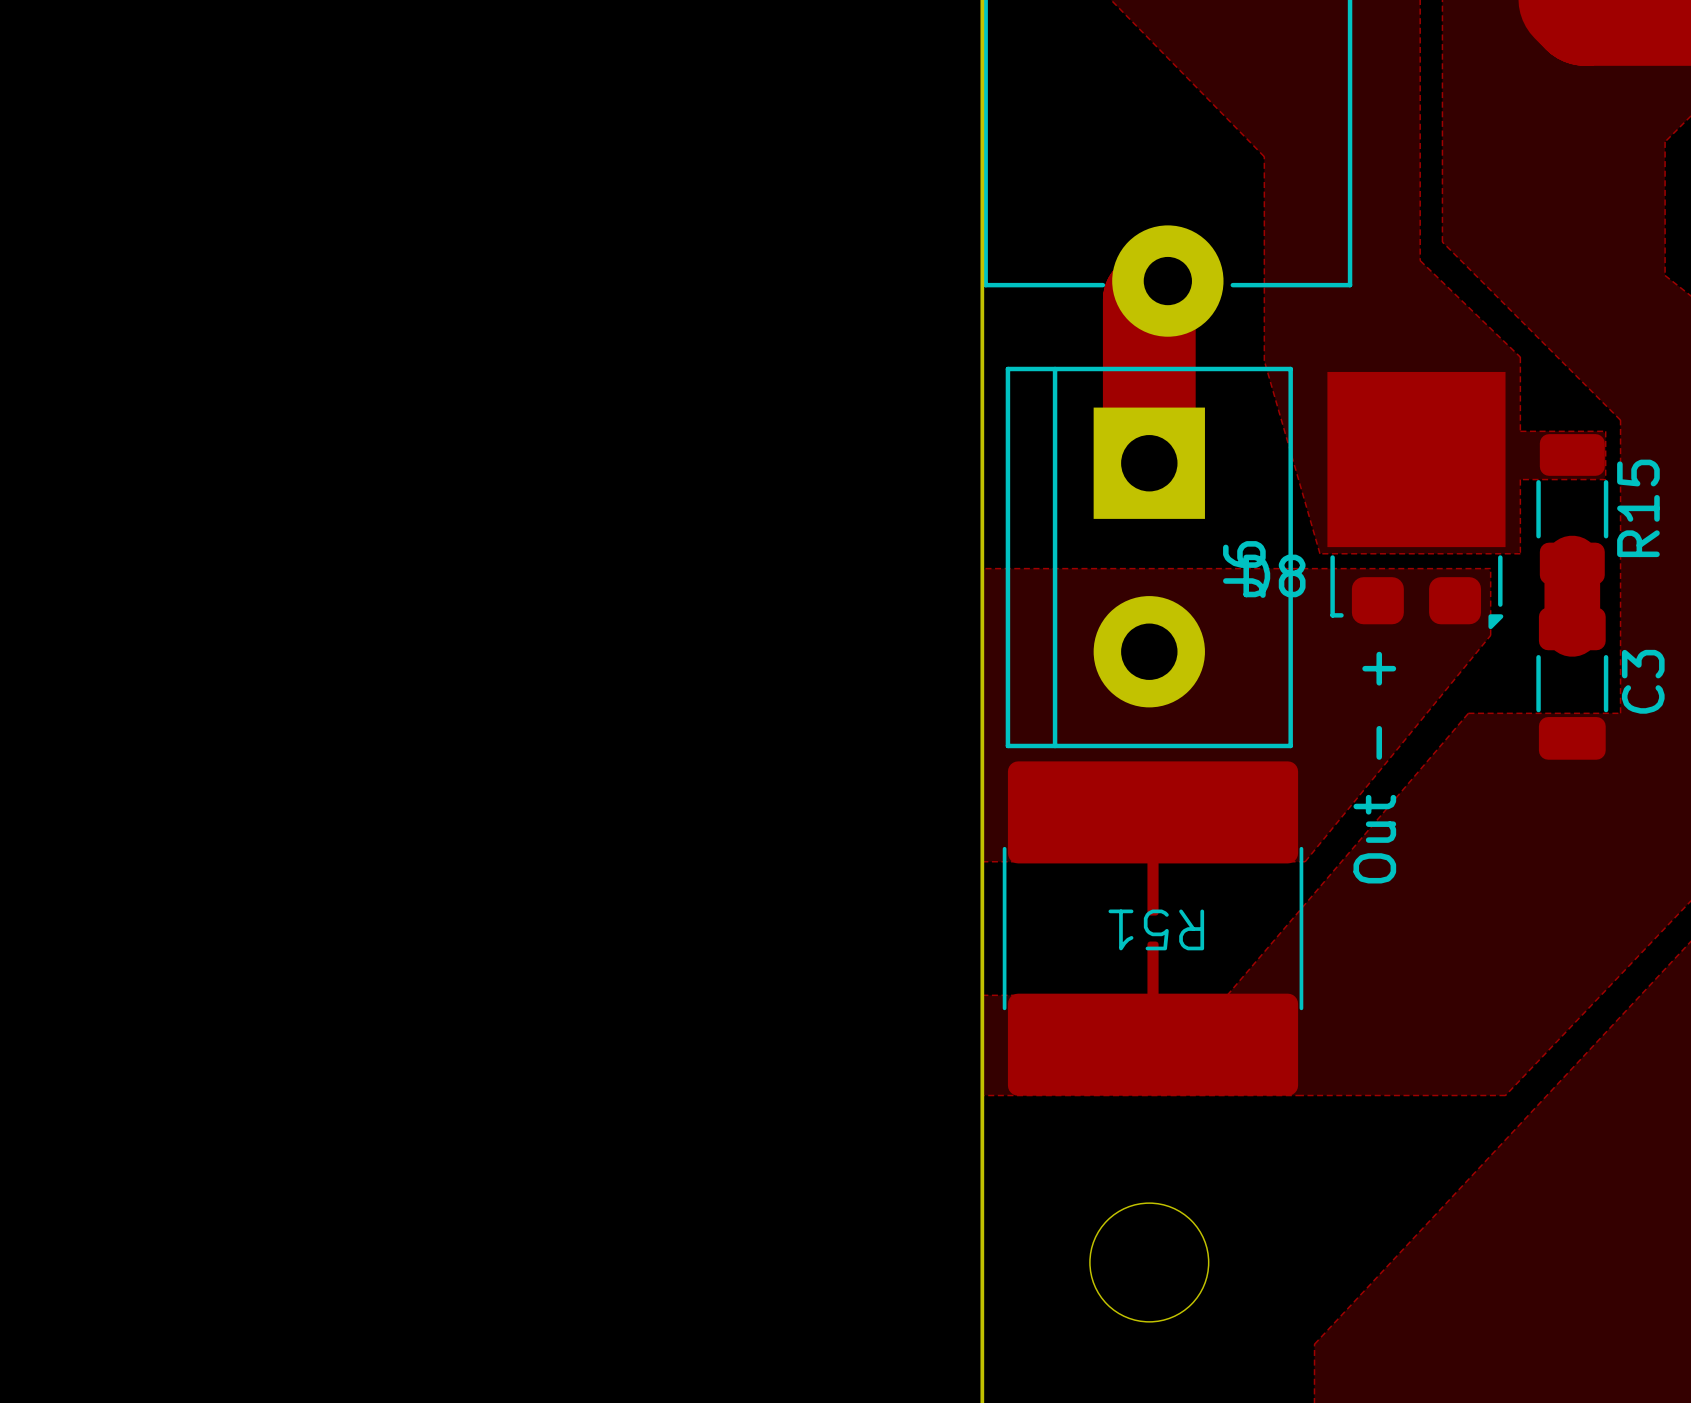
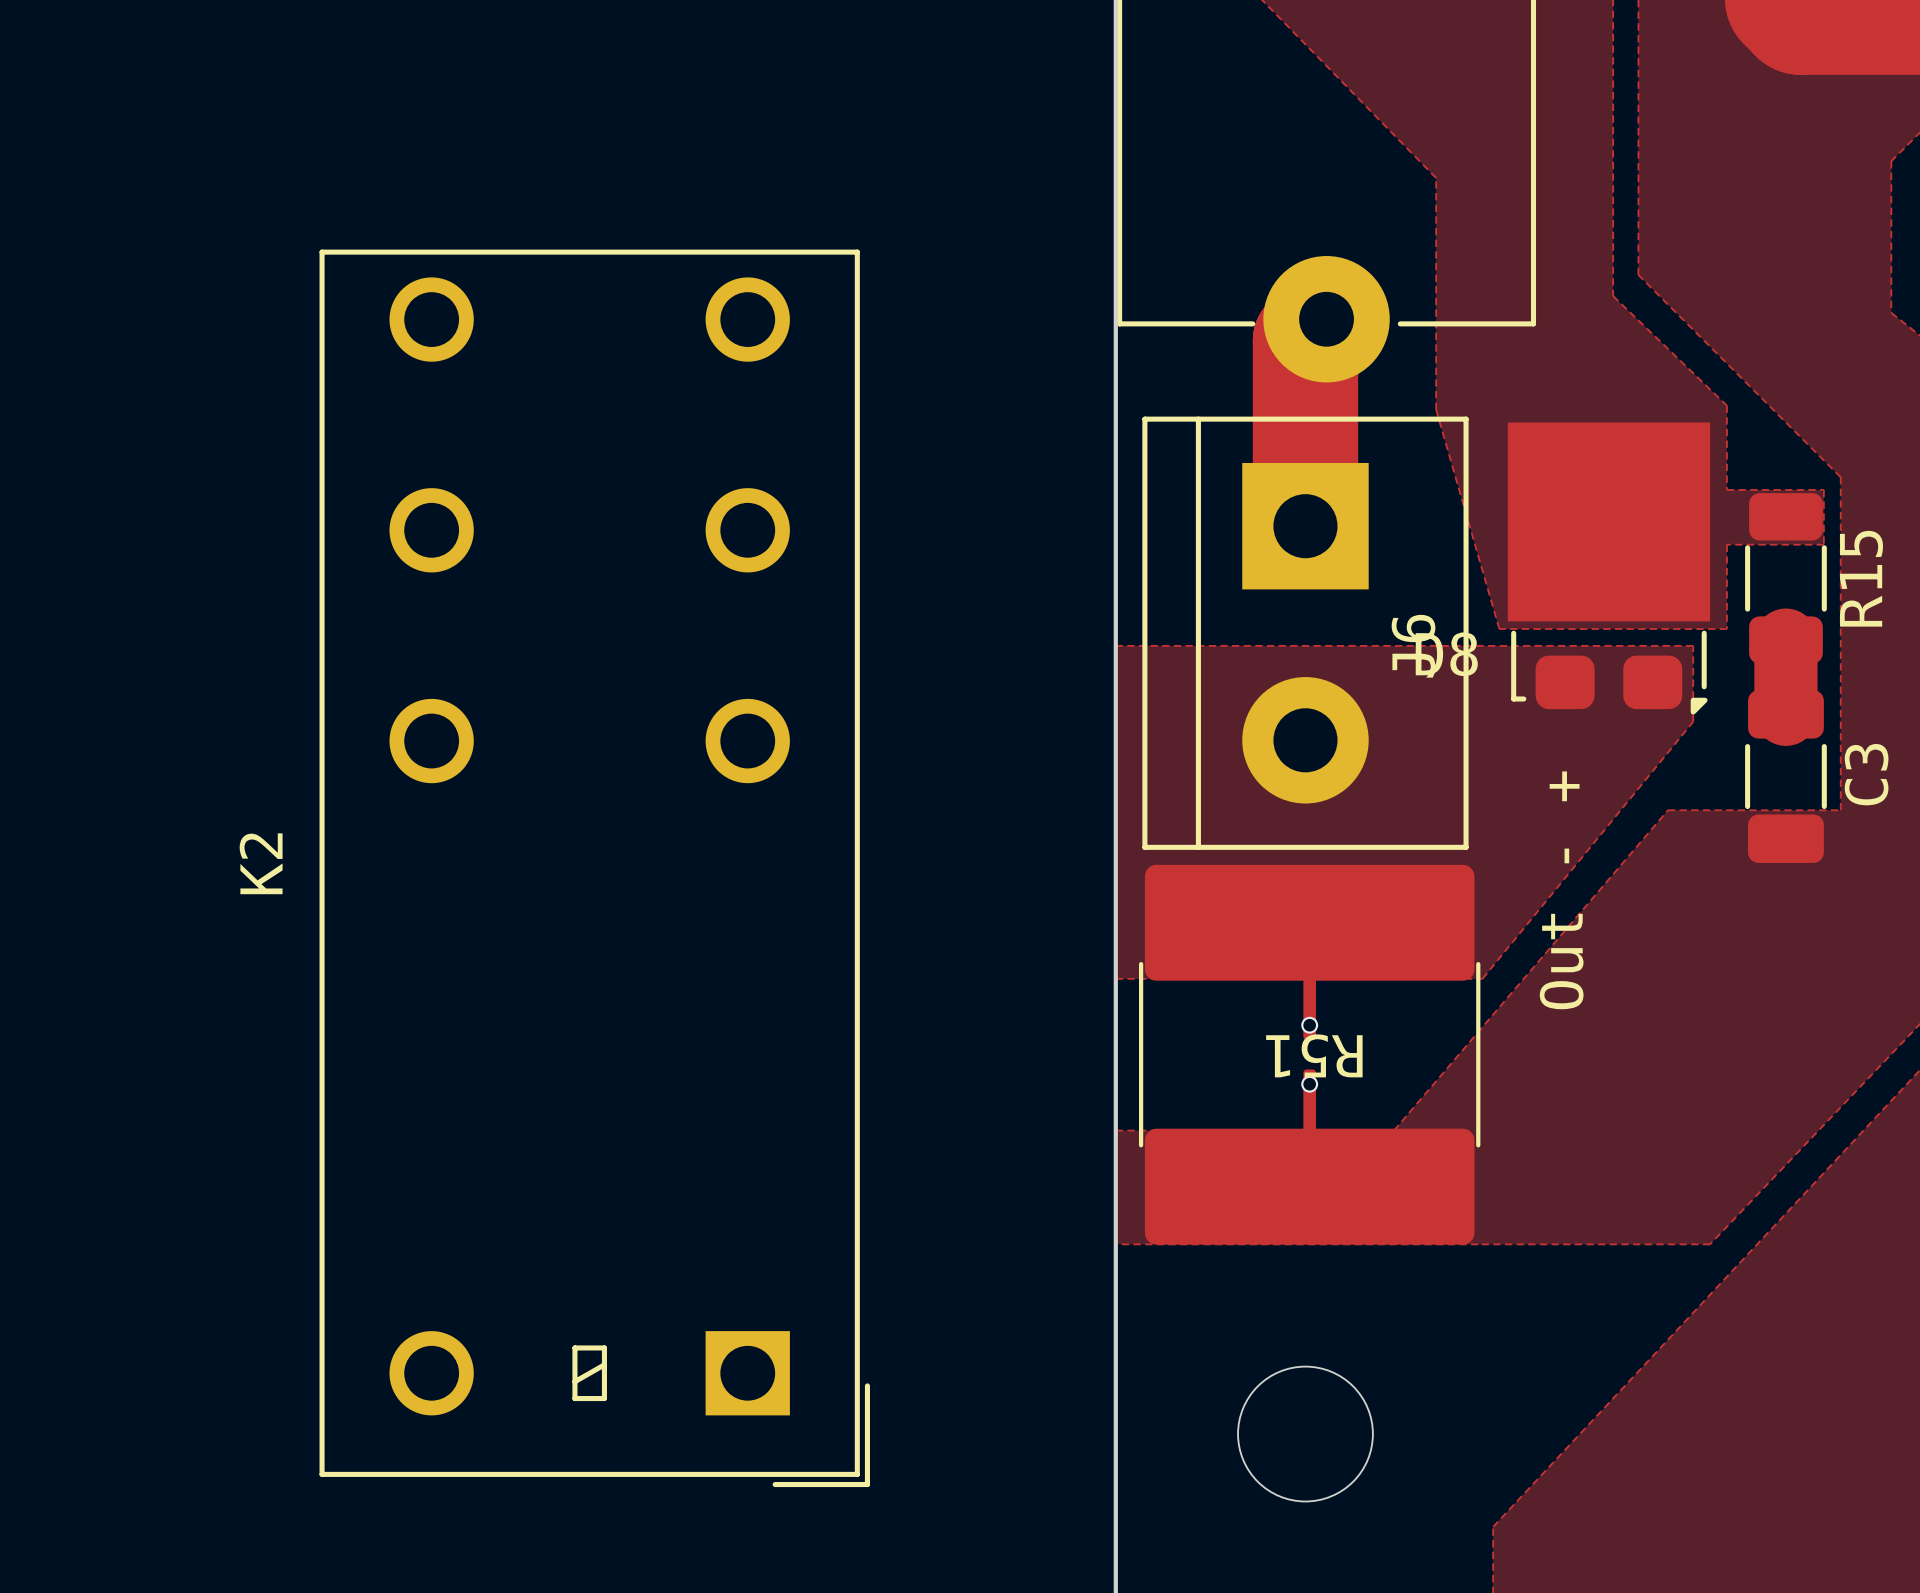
K2: none -> (594, 868)
via: none -> (1309, 1025)
via: none -> (1309, 1084)

